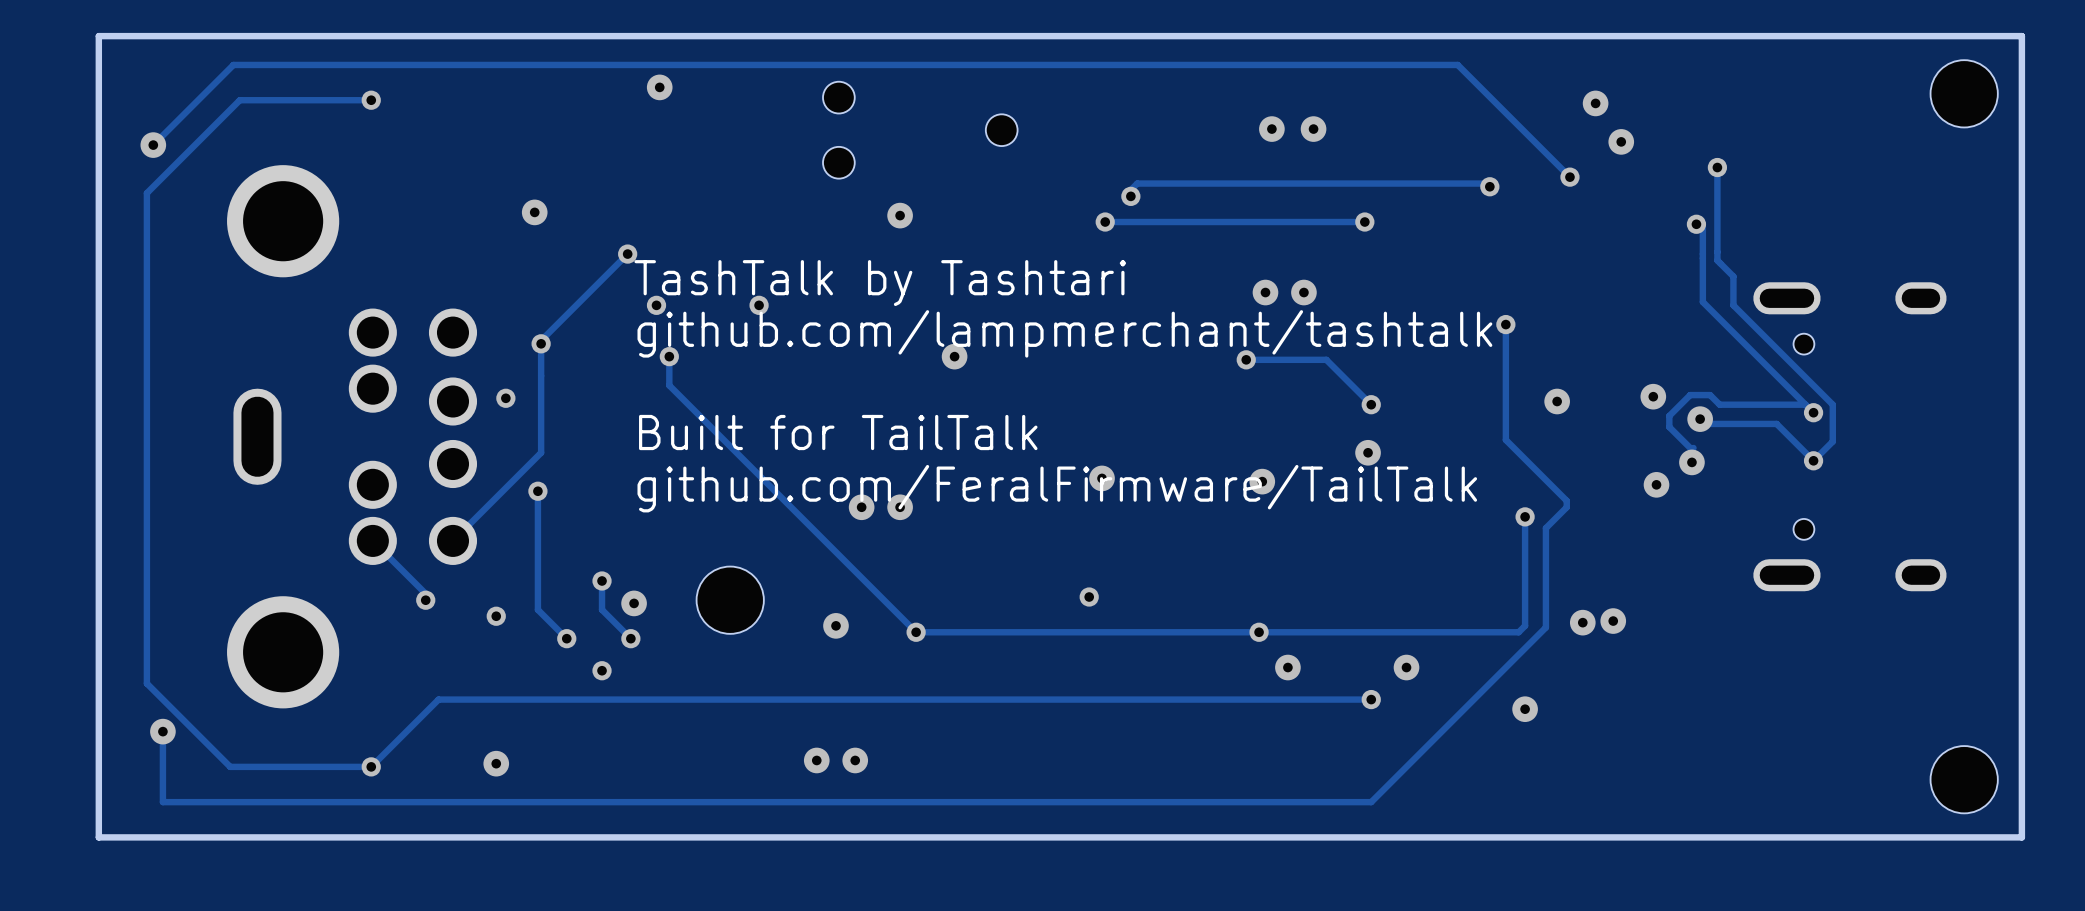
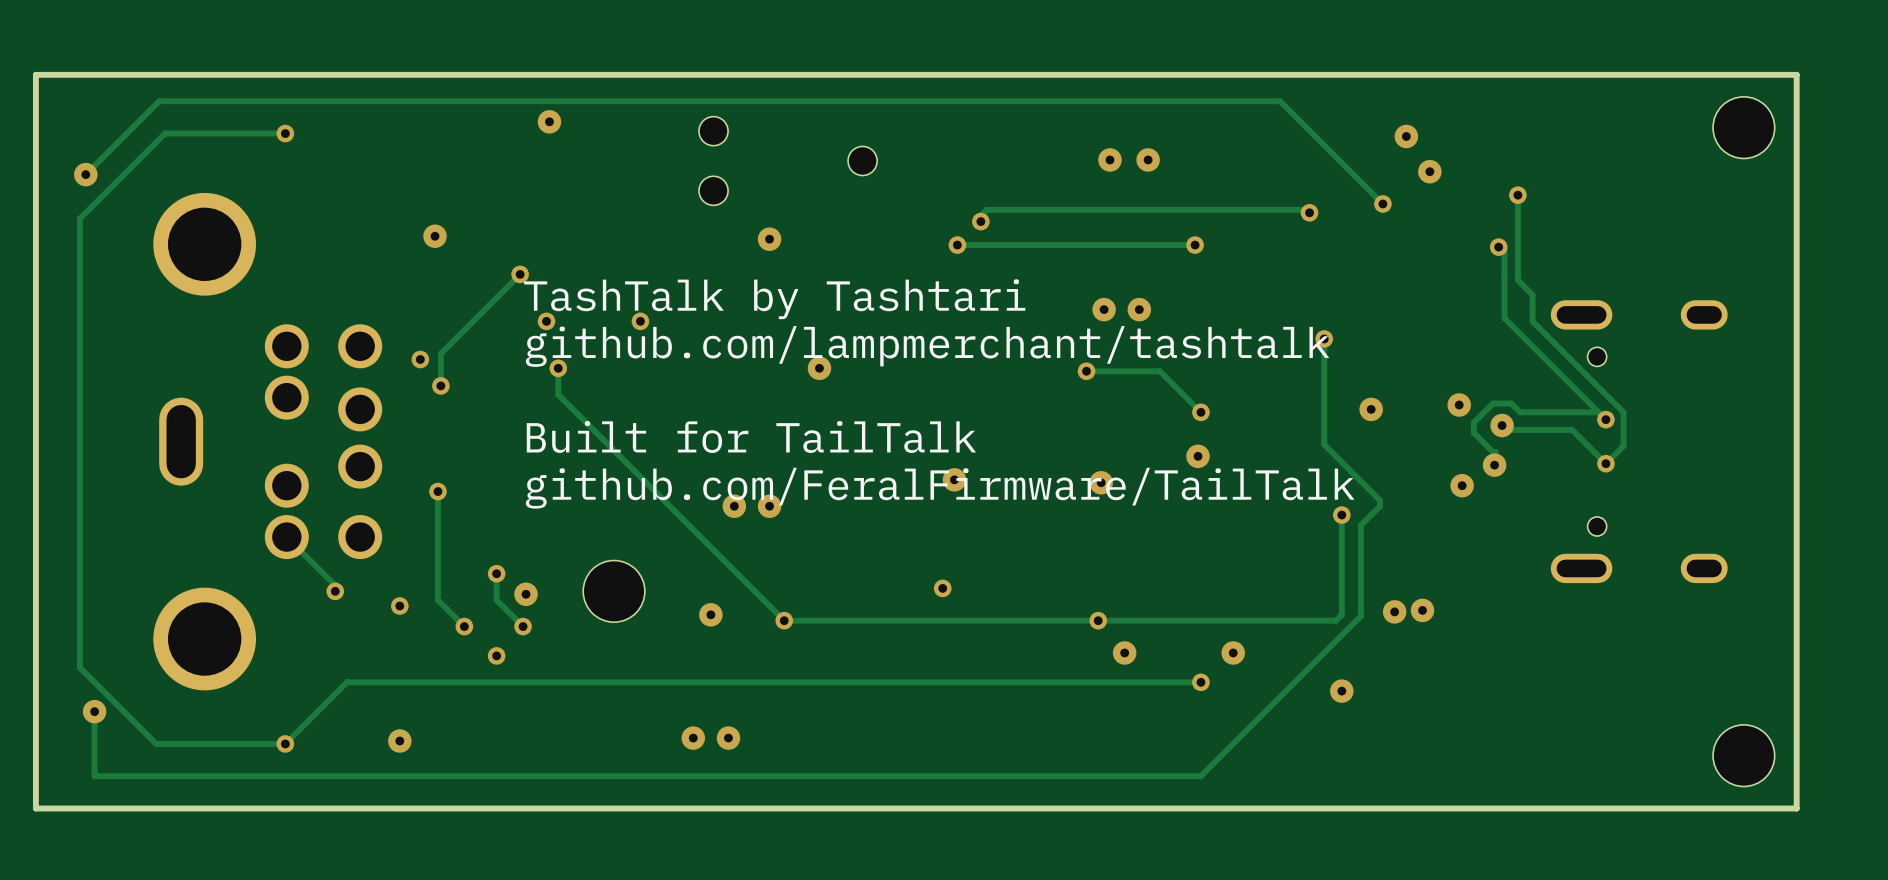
via: (541, 343) -> none
via: none -> (420, 359)
track: (541, 375) (541, 452) (452, 540) -> none
via: none -> (440, 385)
via: (505, 398) -> none

